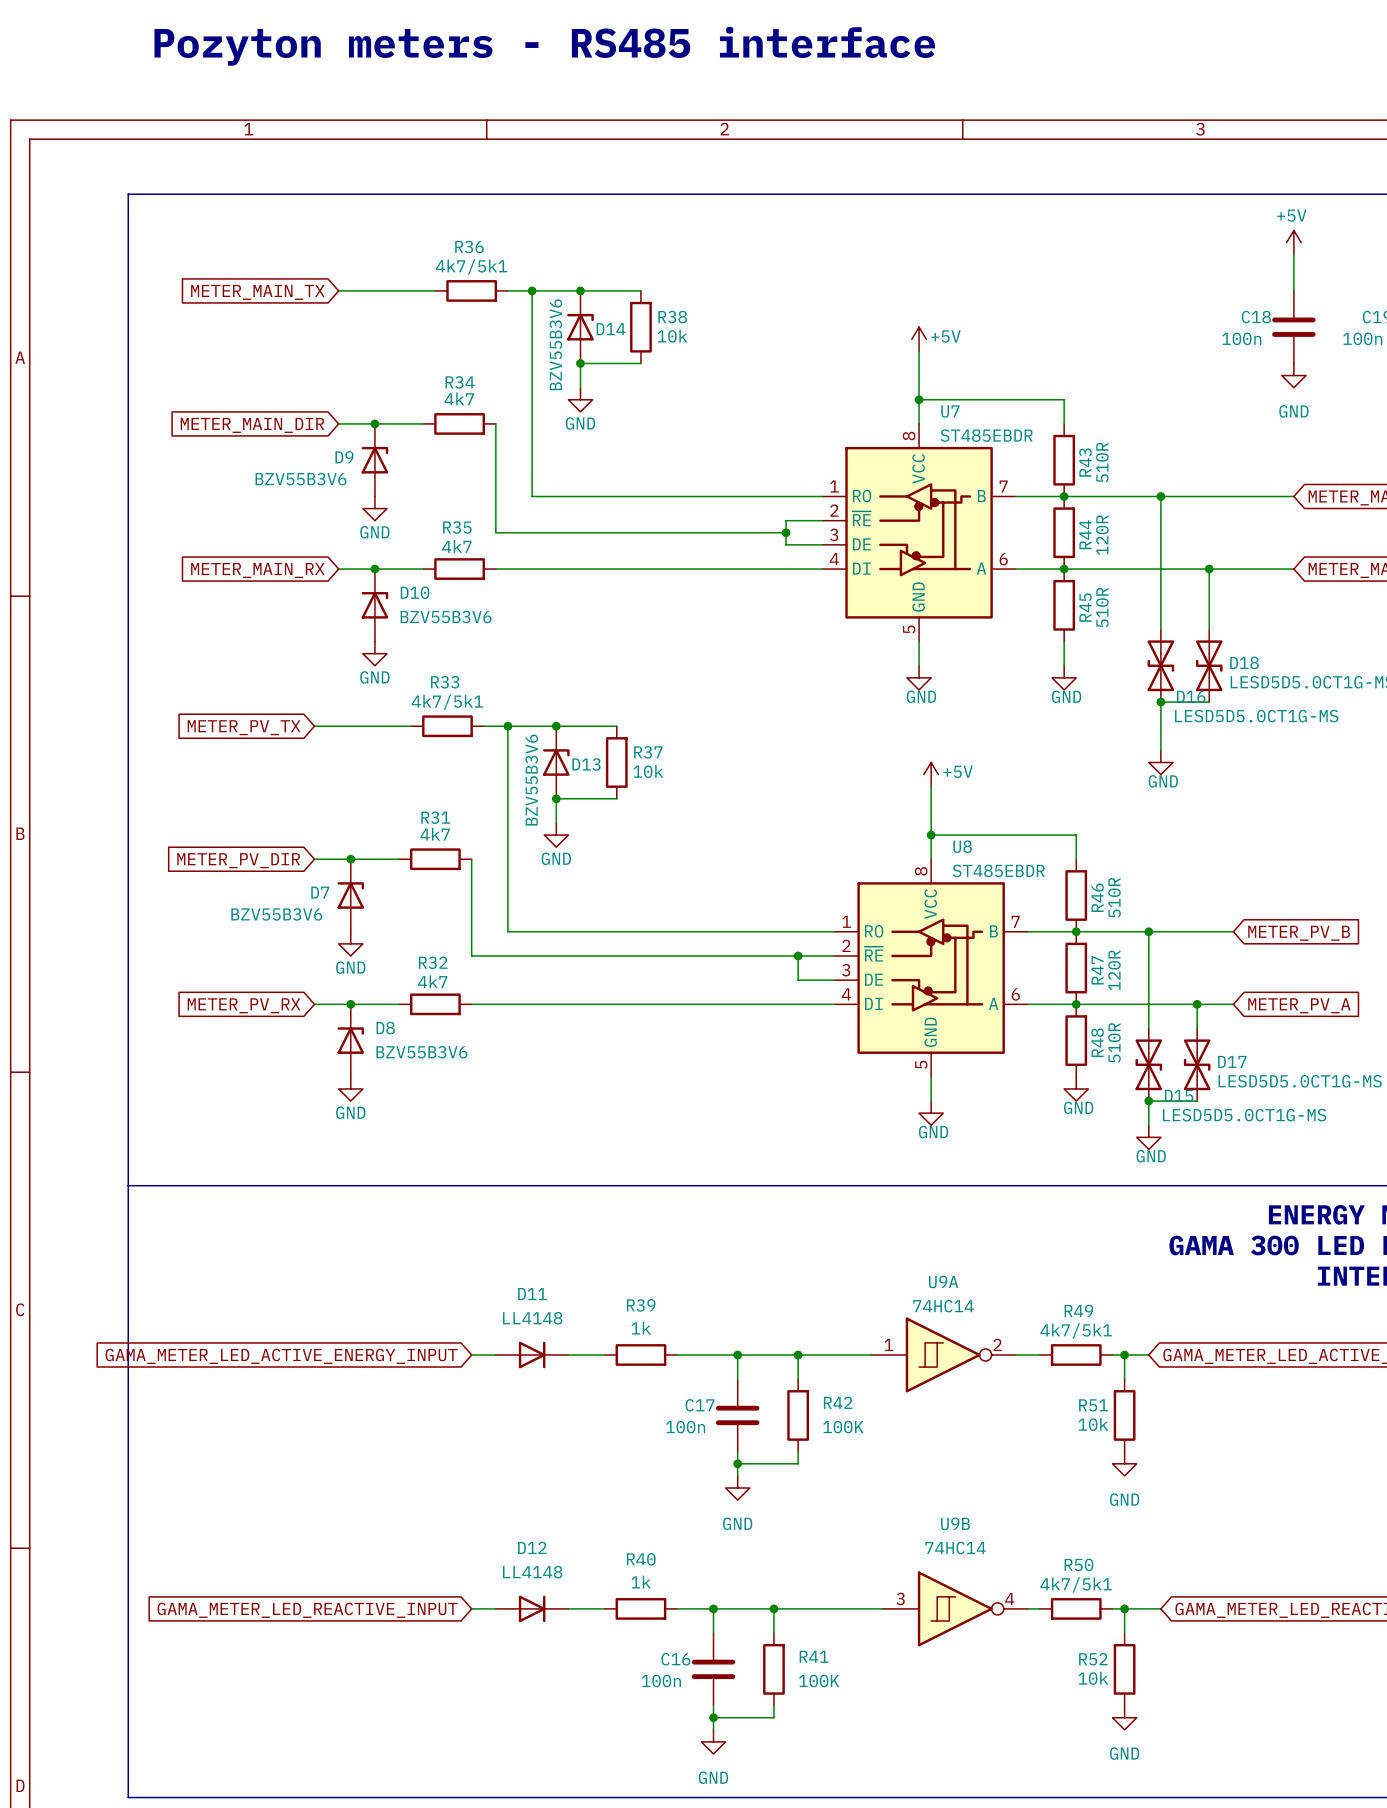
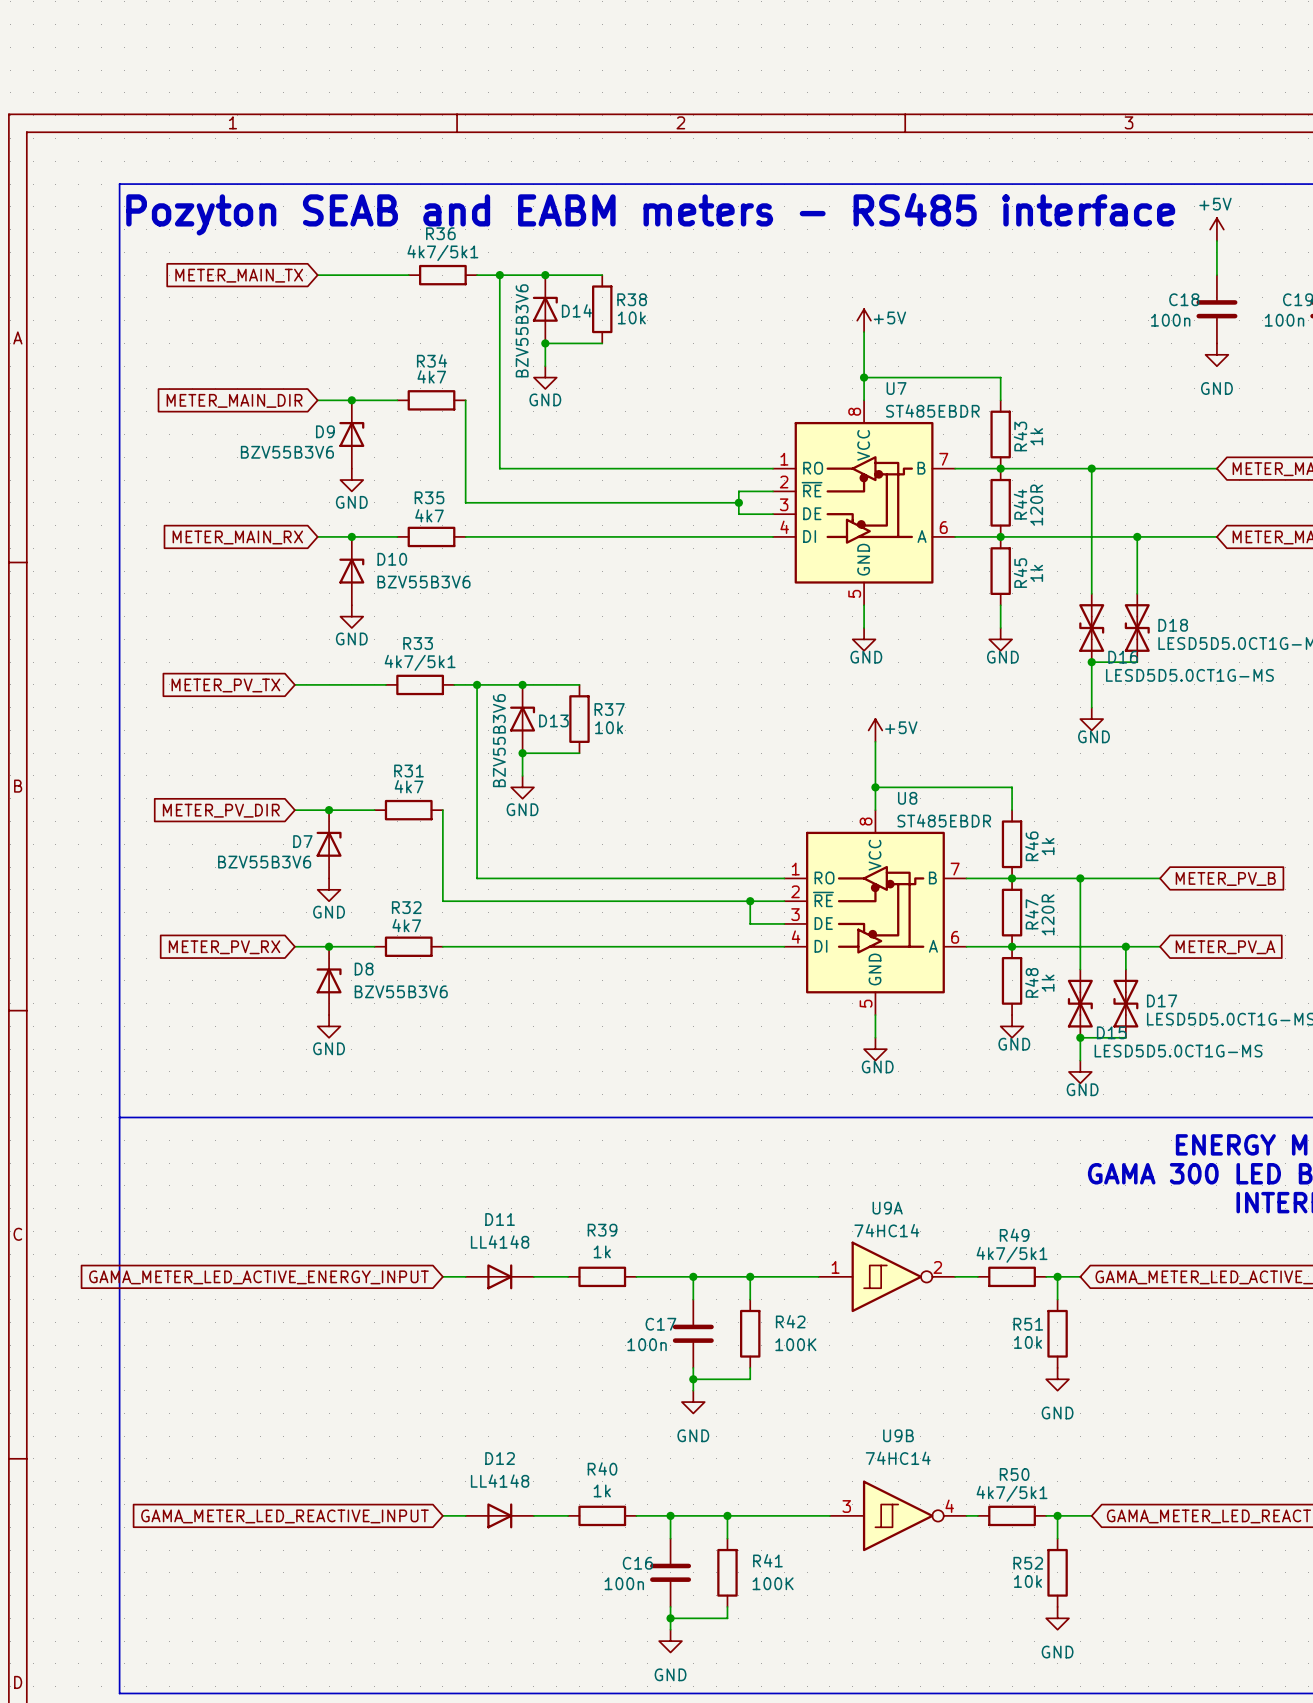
text: Pozyton meters - RS485 interface (544, 46) -> none
text: none -> Pozyton SEAB and EABM meters - RS485 interface (650, 214)
R43 value: 510R (1102, 462) -> 1k (1036, 436)
R45 value: 510R (1102, 607) -> 1k (1036, 573)
R46 value: 510R (1114, 897) -> 1k (1048, 846)
R48 value: 510R (1114, 1042) -> 1k (1048, 983)

